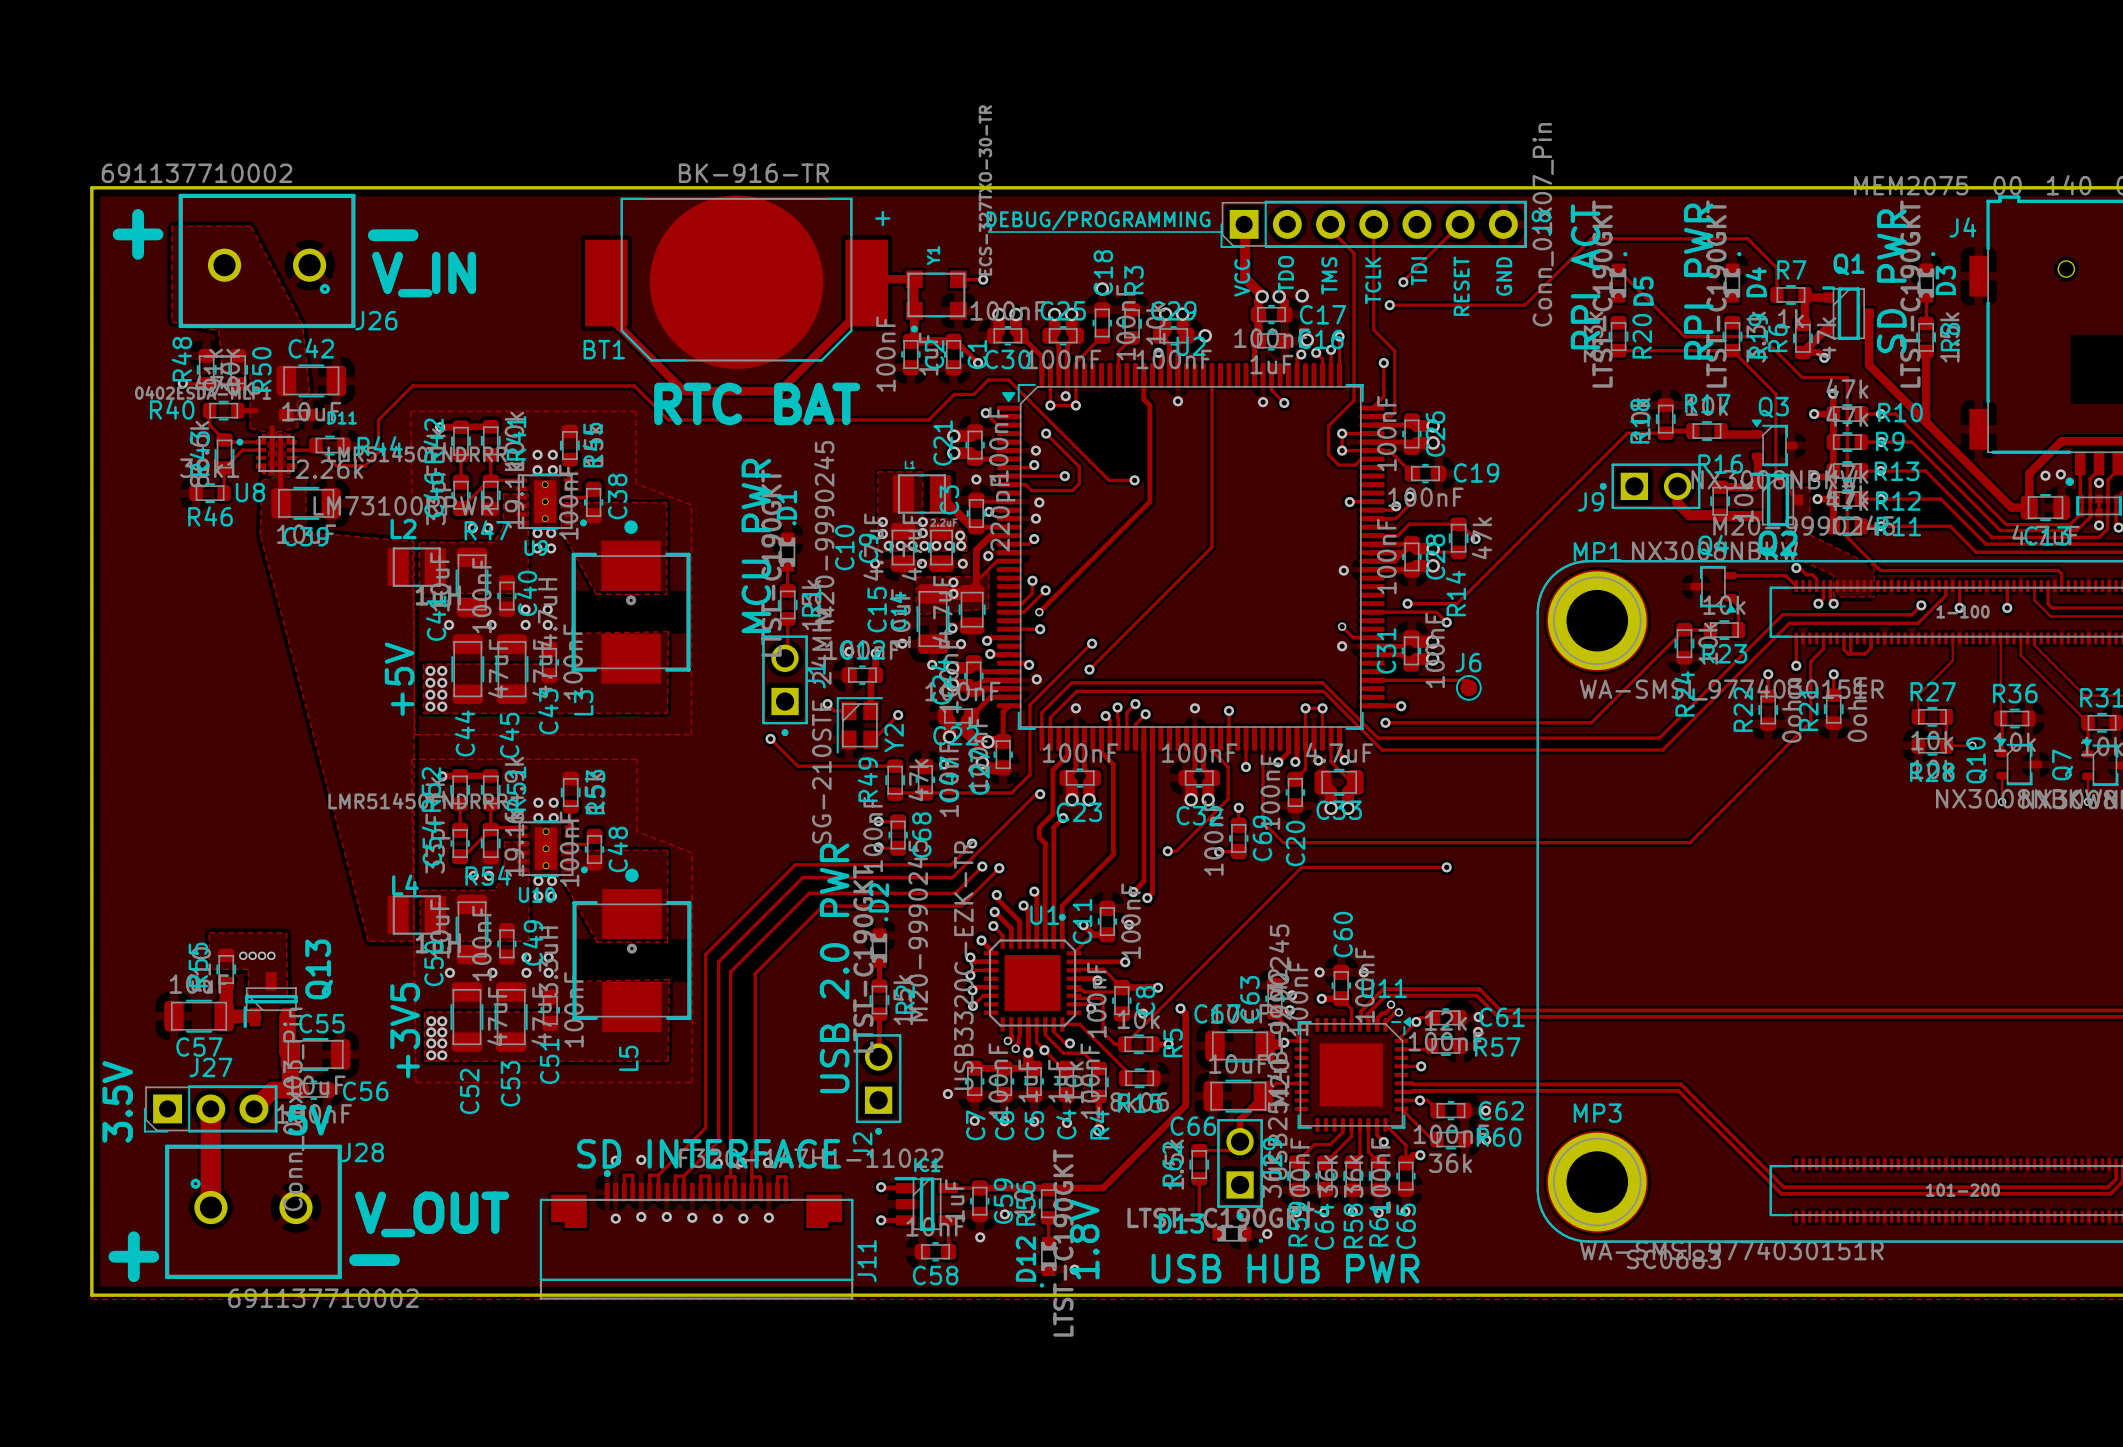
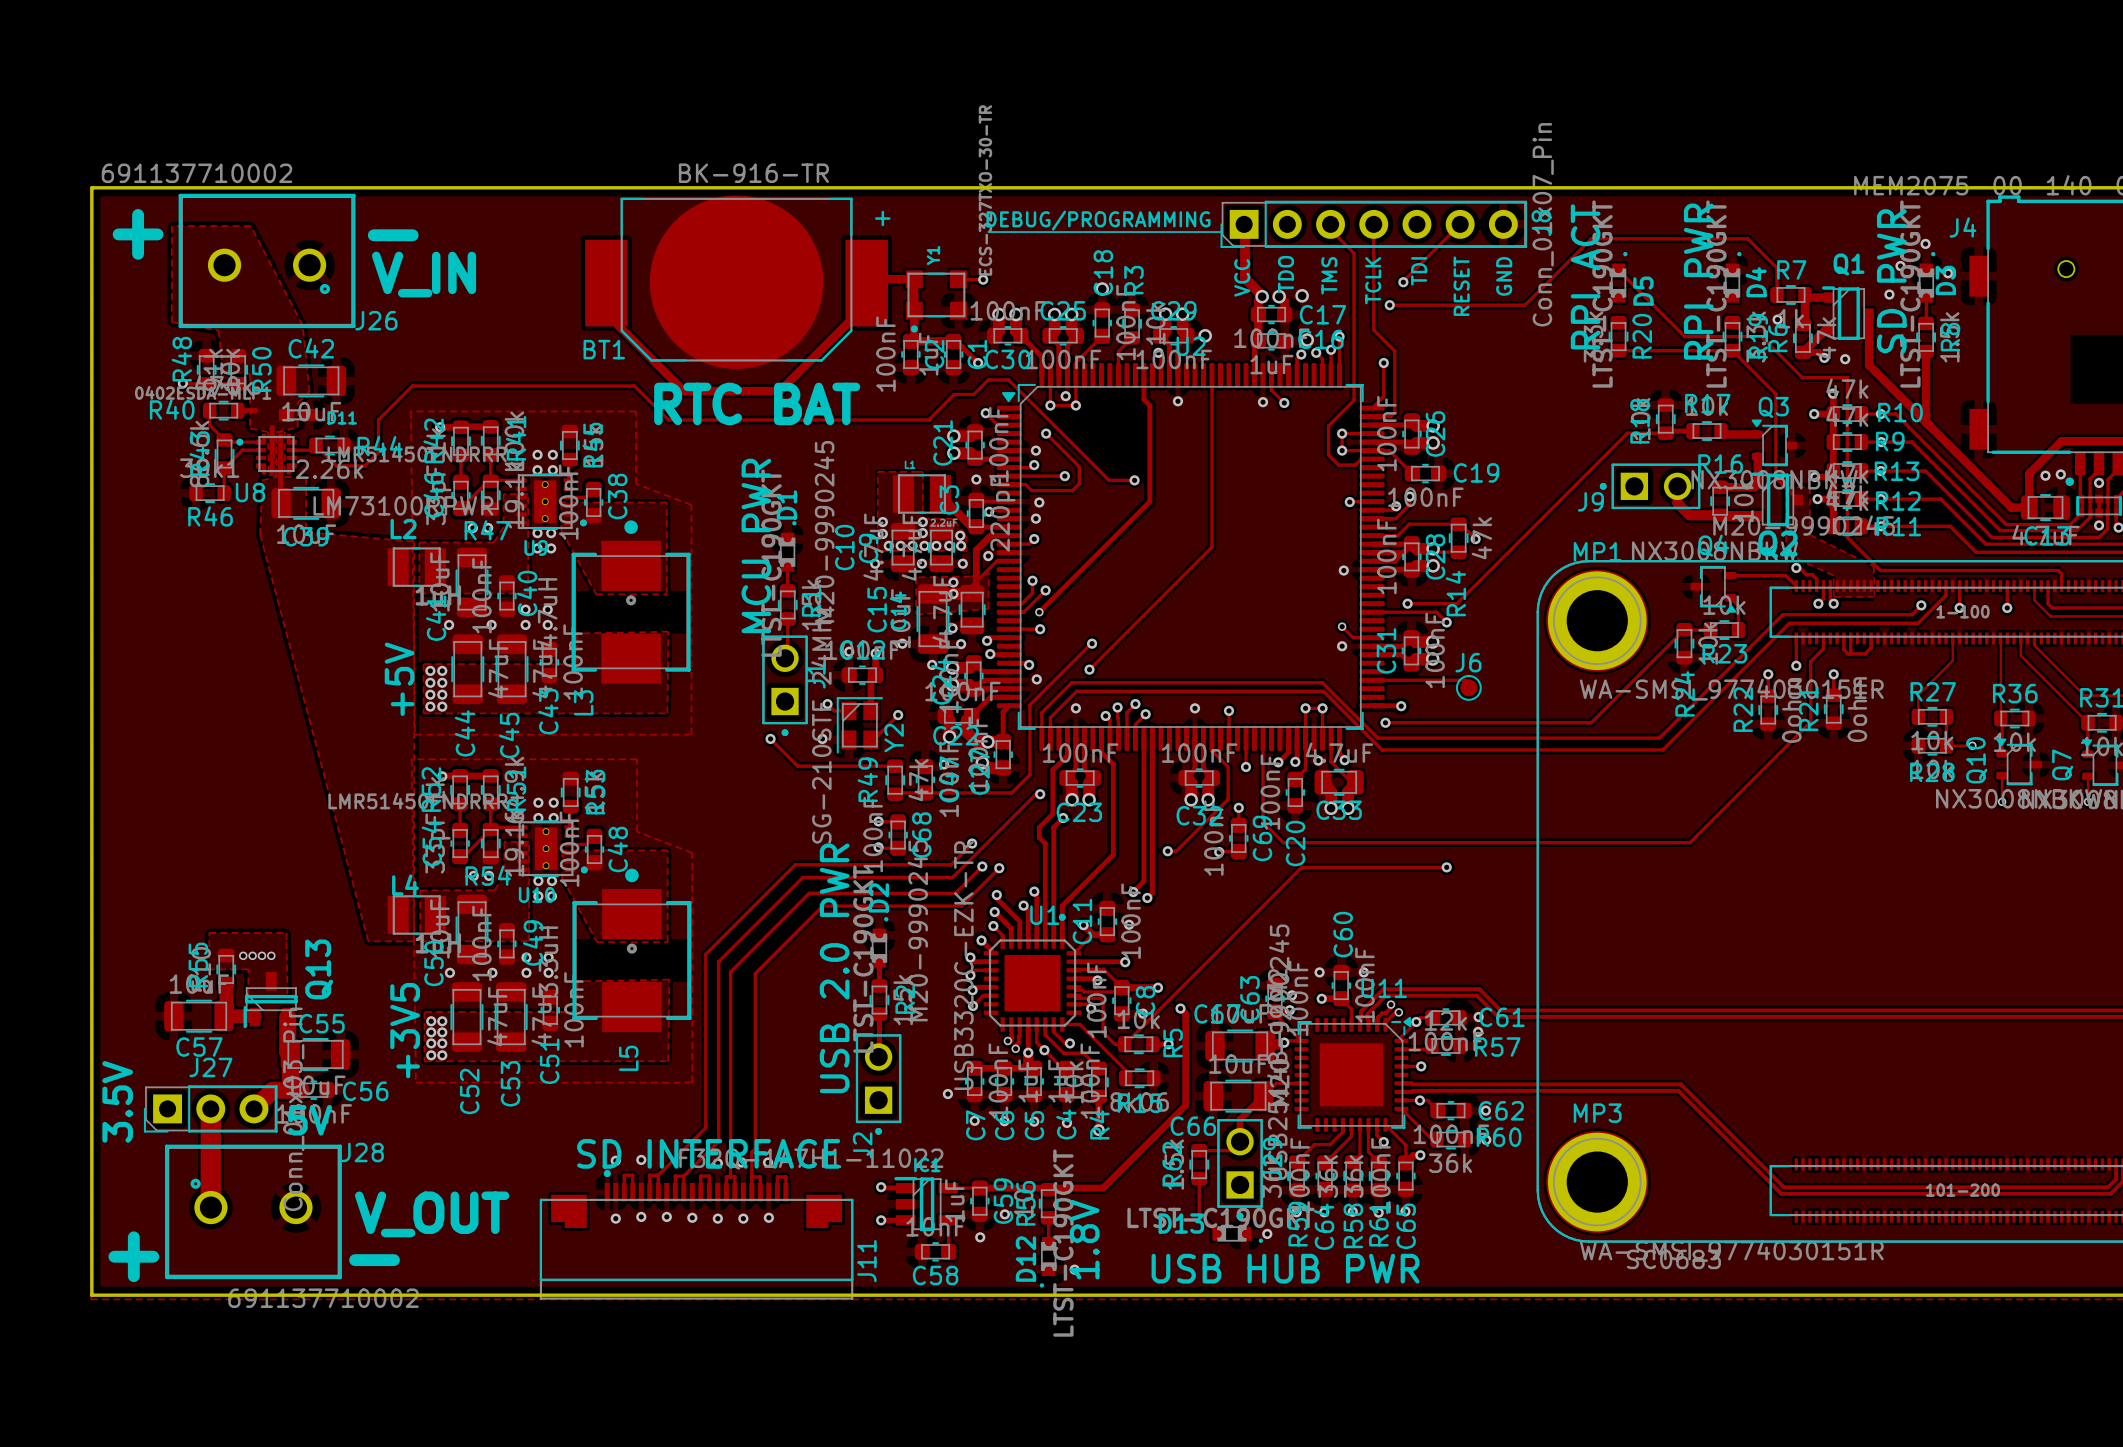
via: none -> (1925, 243)
via: none -> (1900, 266)
via: none -> (1948, 273)
via: none -> (1889, 294)
via: none -> (1777, 319)
via: none -> (1845, 359)
via: none -> (822, 738)

